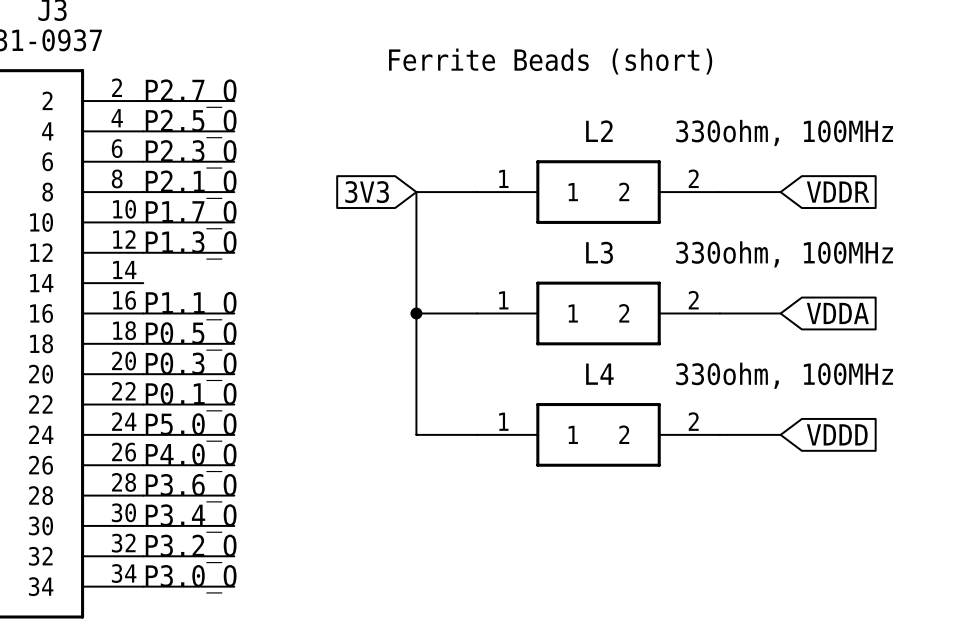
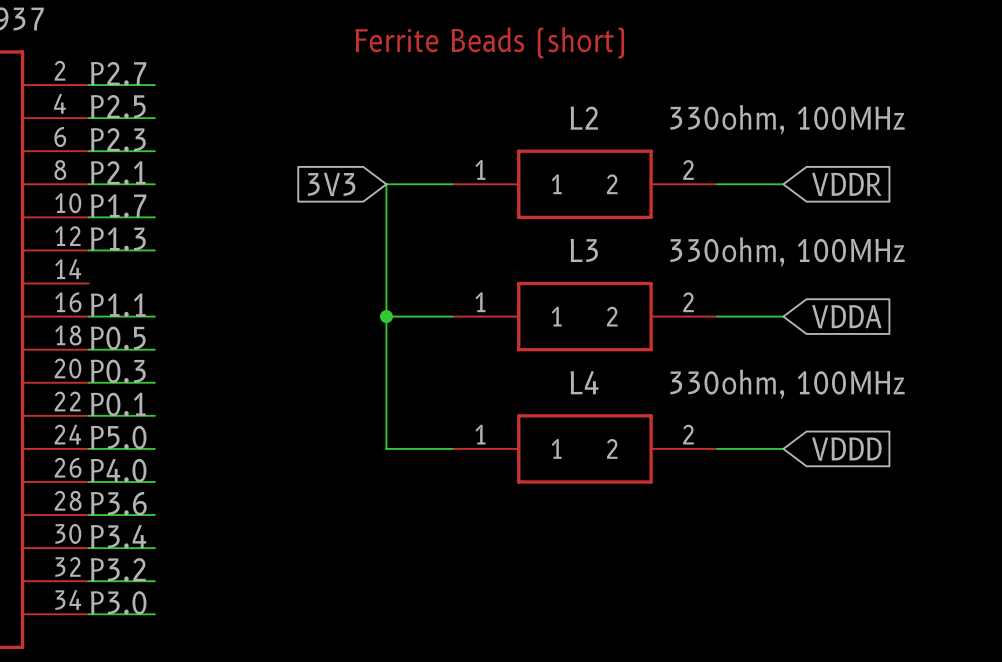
label: P2.7_O (191, 93) -> P2.7 (118, 73)
wire: (203, 101) (234, 101) -> none
label: P2.5_O (191, 124) -> P2.5 (118, 106)
wire: (203, 131) (234, 131) -> none
label: P2.3_O (191, 154) -> P2.3 (118, 139)
wire: (203, 161) (234, 161) -> none
label: P2.1_O (191, 184) -> P2.1 (118, 172)
wire: (203, 192) (234, 192) -> none
label: P1.7_O (191, 215) -> P1.7 (118, 205)
wire: (203, 222) (234, 222) -> none
label: P1.3_O (191, 245) -> P1.3 (118, 238)
wire: (203, 252) (234, 252) -> none
label: P1.1_O (191, 306) -> P1.1 (118, 305)
wire: (203, 313) (234, 313) -> none
label: P0.5_O (191, 336) -> P0.5 (118, 338)
wire: (203, 343) (234, 343) -> none
label: P0.3_O (191, 366) -> P0.3 (118, 371)
wire: (203, 374) (234, 374) -> none
label: P0.1_O (191, 397) -> P0.1 (118, 404)
wire: (203, 404) (234, 404) -> none
label: P5.0_O (191, 427) -> P5.0 (118, 437)
wire: (203, 434) (234, 434) -> none
label: P4.0_O (191, 457) -> P4.0 (118, 470)
wire: (203, 465) (234, 465) -> none
label: P3.6_O (191, 488) -> P3.6 (118, 503)
wire: (203, 495) (234, 495) -> none
label: P3.4_O (191, 518) -> P3.4 (118, 536)
wire: (203, 525) (234, 525) -> none
label: P3.2_O (191, 548) -> P3.2 (118, 569)
wire: (203, 556) (234, 556) -> none
label: P3.0_O (191, 579) -> P3.0 (118, 602)
wire: (203, 586) (234, 586) -> none

